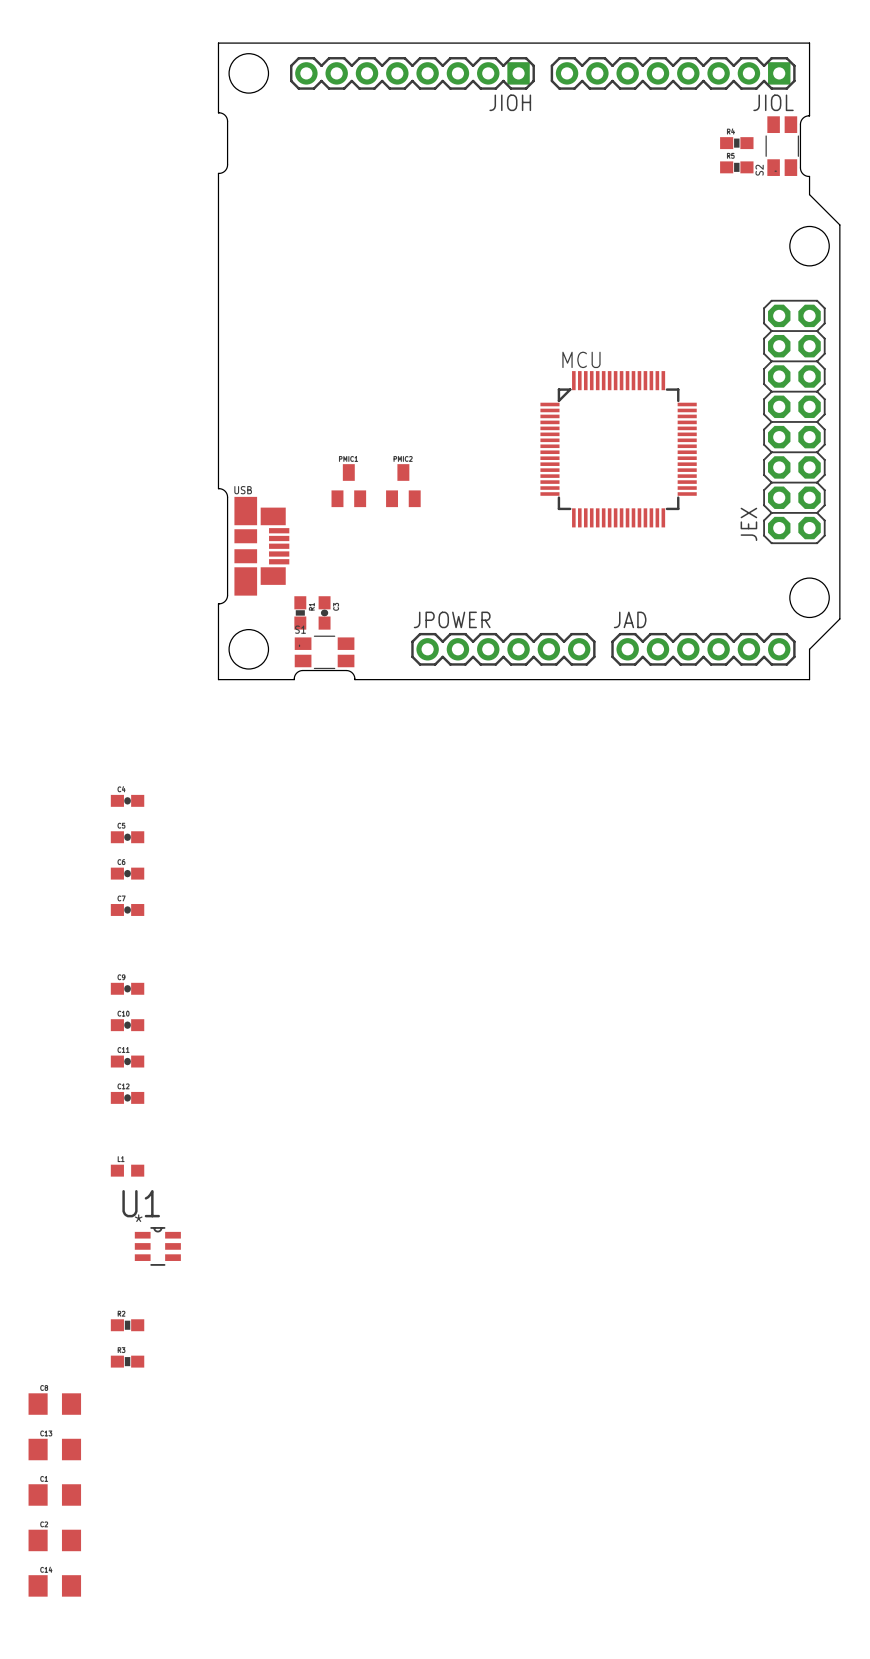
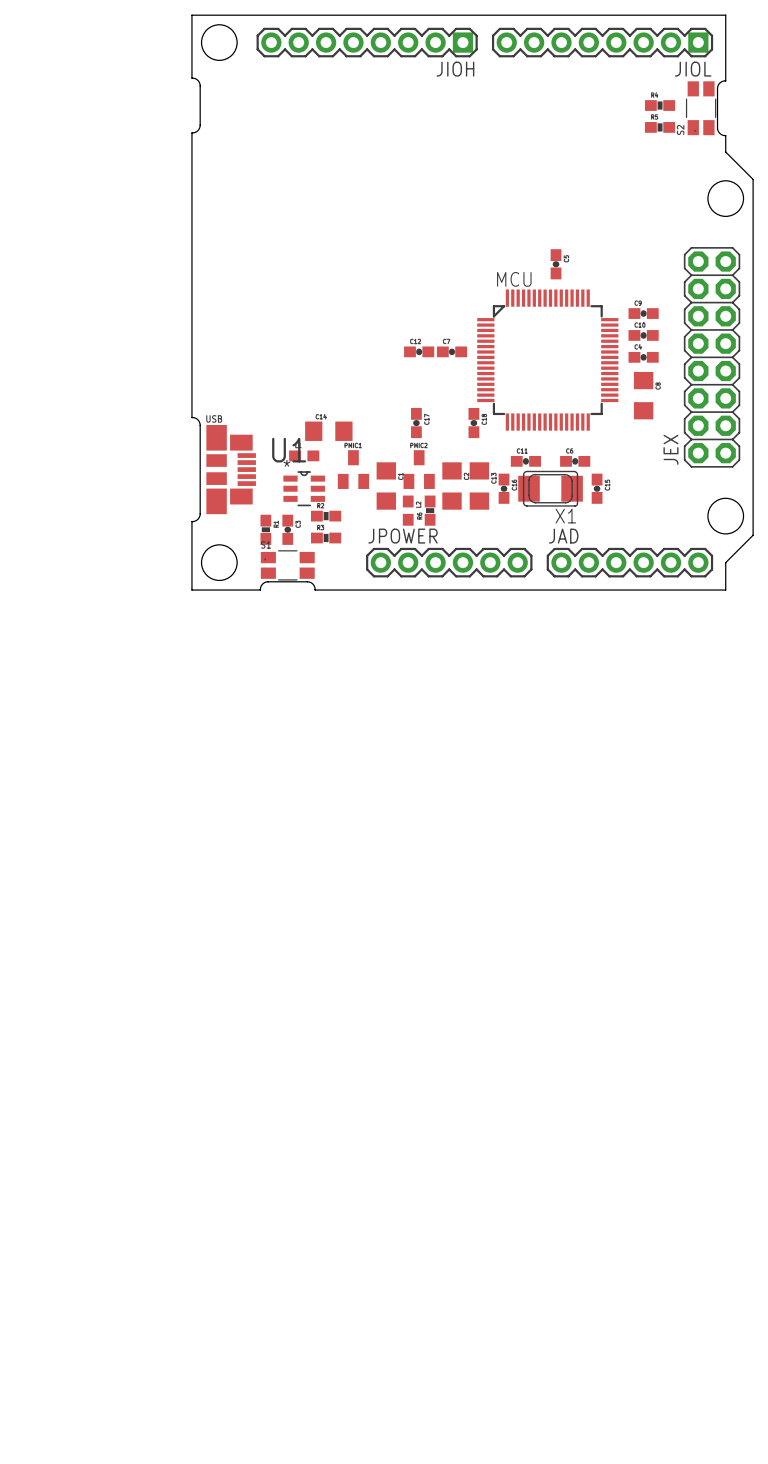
MCU position: (618, 449) -> (547, 360)
part position: (348, 485) -> (353, 469)
part position: (403, 485) -> (419, 469)
part: none -> (416, 423)
part: none -> (473, 423)
part: none -> (504, 488)
X1: none -> (550, 488)
part: none -> (597, 488)
part: none -> (408, 510)
part: none -> (430, 510)
part position: (127, 800) -> (643, 357)
part rotation: 0° (127, 837) -> 90° clockwise (556, 264)
part position: (127, 837) -> (556, 264)
part position: (127, 873) -> (575, 461)
part position: (127, 909) -> (452, 351)
part position: (127, 988) -> (643, 313)
part position: (127, 1025) -> (643, 335)
part position: (127, 1061) -> (525, 461)
part position: (127, 1097) -> (419, 351)
part position: (127, 1170) -> (304, 455)
U1 position: (157, 1246) -> (304, 488)
part position: (127, 1325) -> (326, 516)
part position: (127, 1361) -> (326, 538)
part rotation: 0° (54, 1404) -> 90° clockwise (643, 395)
part position: (54, 1404) -> (643, 395)
part rotation: 0° (54, 1449) -> 90° clockwise (479, 485)
part position: (54, 1449) -> (479, 485)
part rotation: 0° (54, 1494) -> 90° clockwise (386, 485)
part position: (54, 1494) -> (386, 485)
part rotation: 0° (54, 1540) -> 90° clockwise (452, 485)
part position: (54, 1540) -> (452, 485)
part position: (54, 1585) -> (328, 431)

